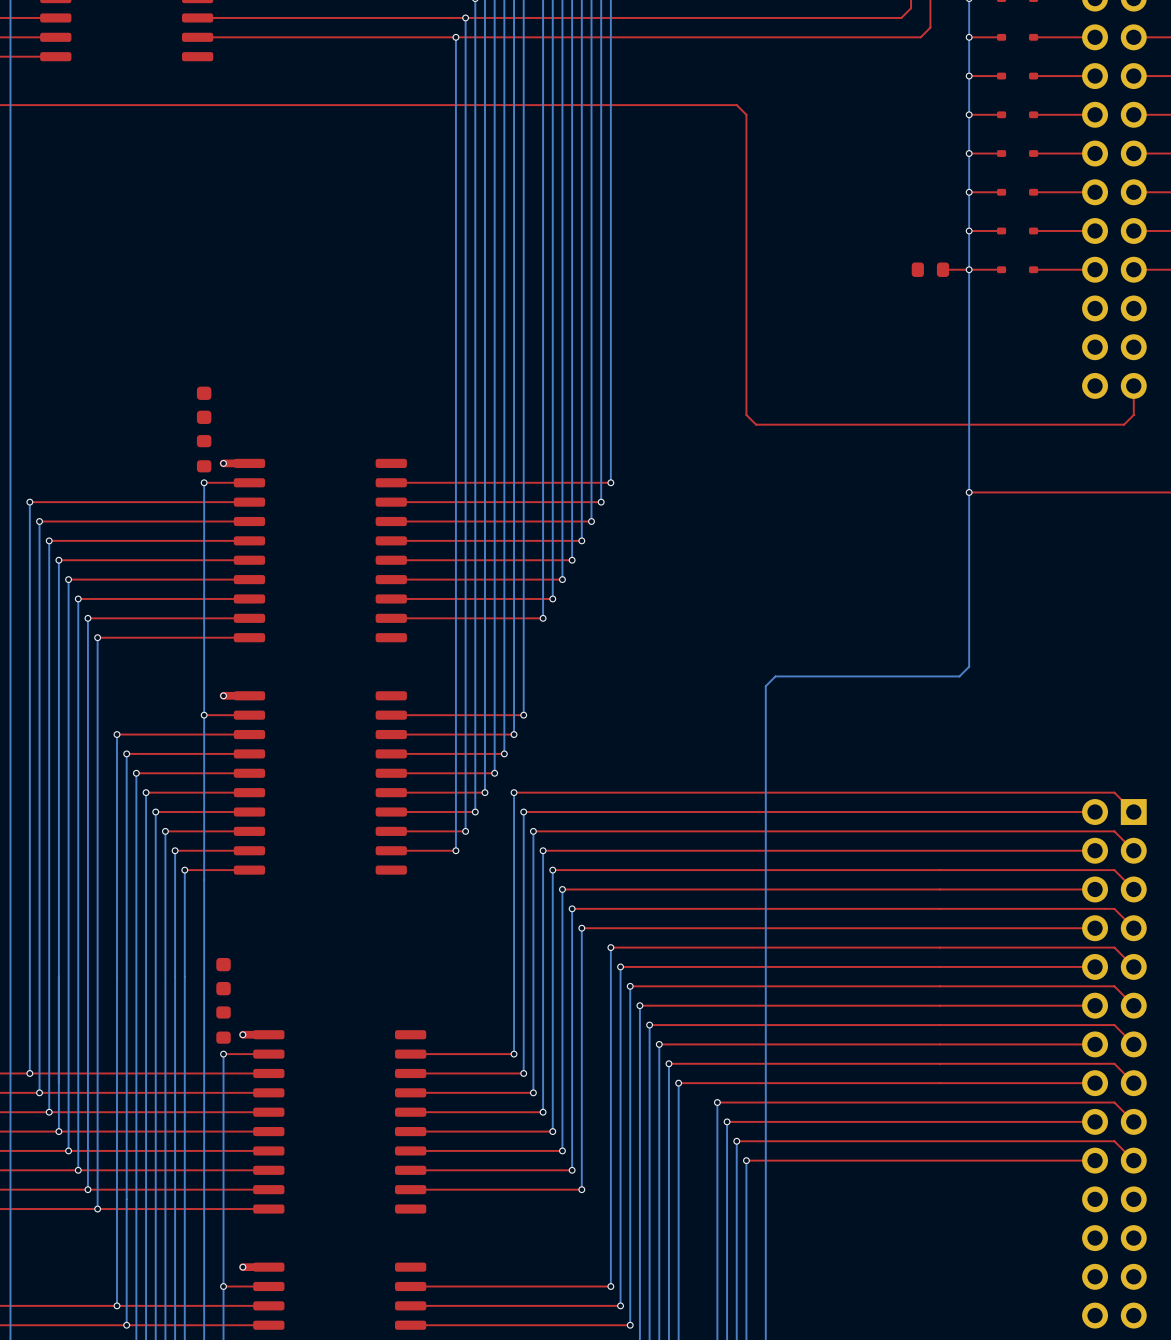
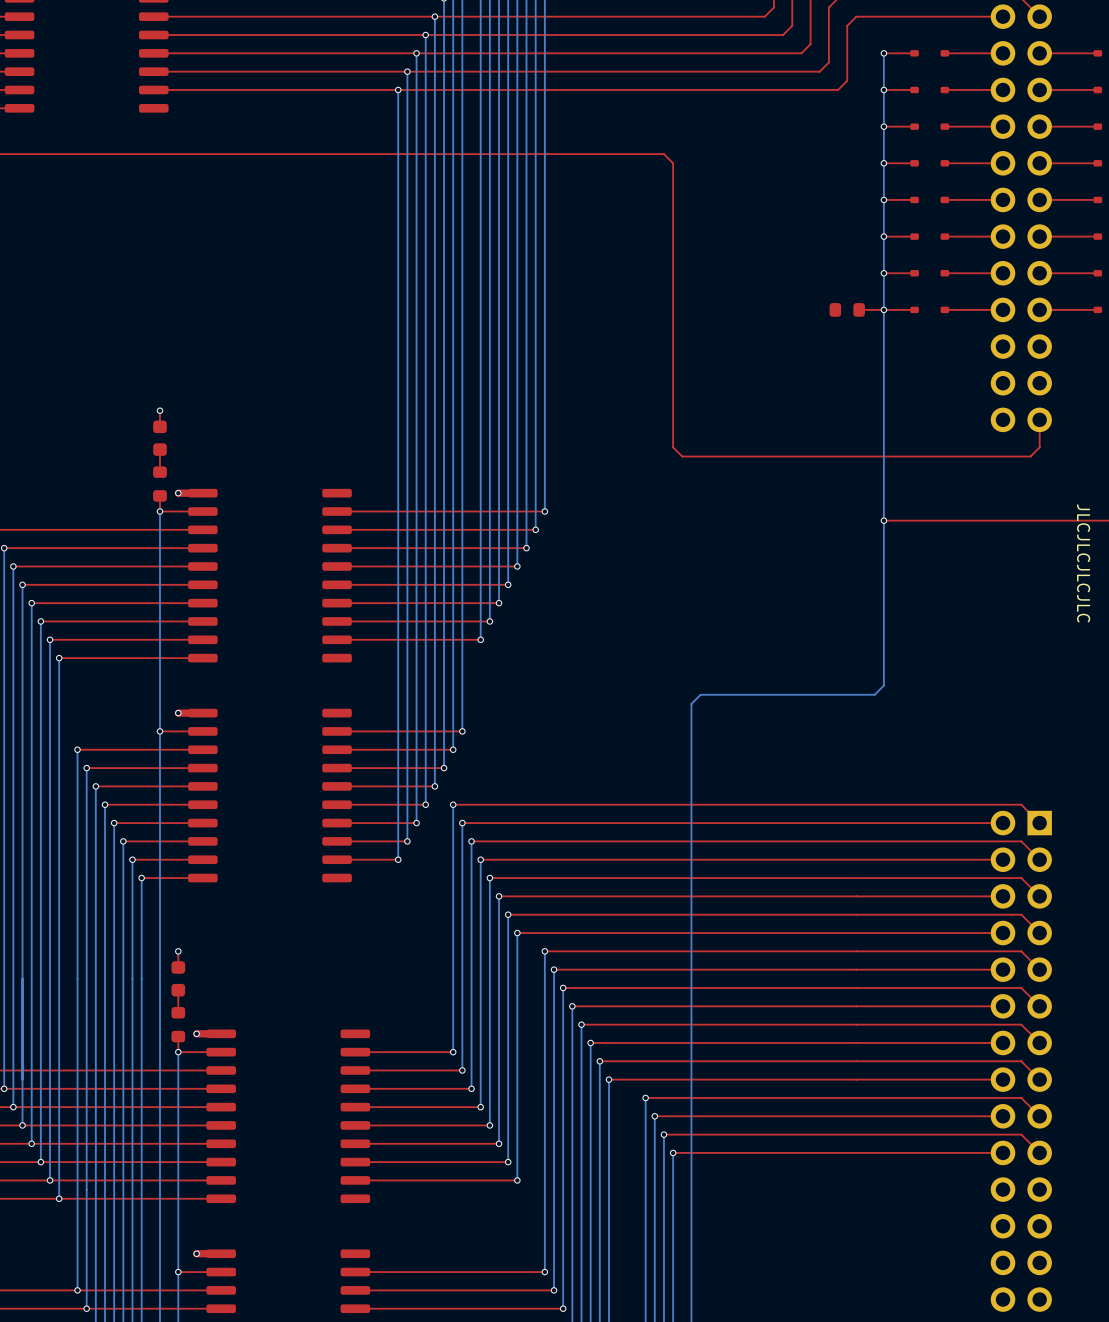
top track: none -> (159, 410) (159, 426)
via: none -> (159, 410)
top track: none -> (159, 449) (159, 472)
top track: none -> (159, 495) (159, 511)
top track: none -> (178, 951) (178, 967)
via: none -> (178, 951)
top track: none -> (178, 990) (178, 1012)
top track: none -> (178, 1036) (178, 1052)

